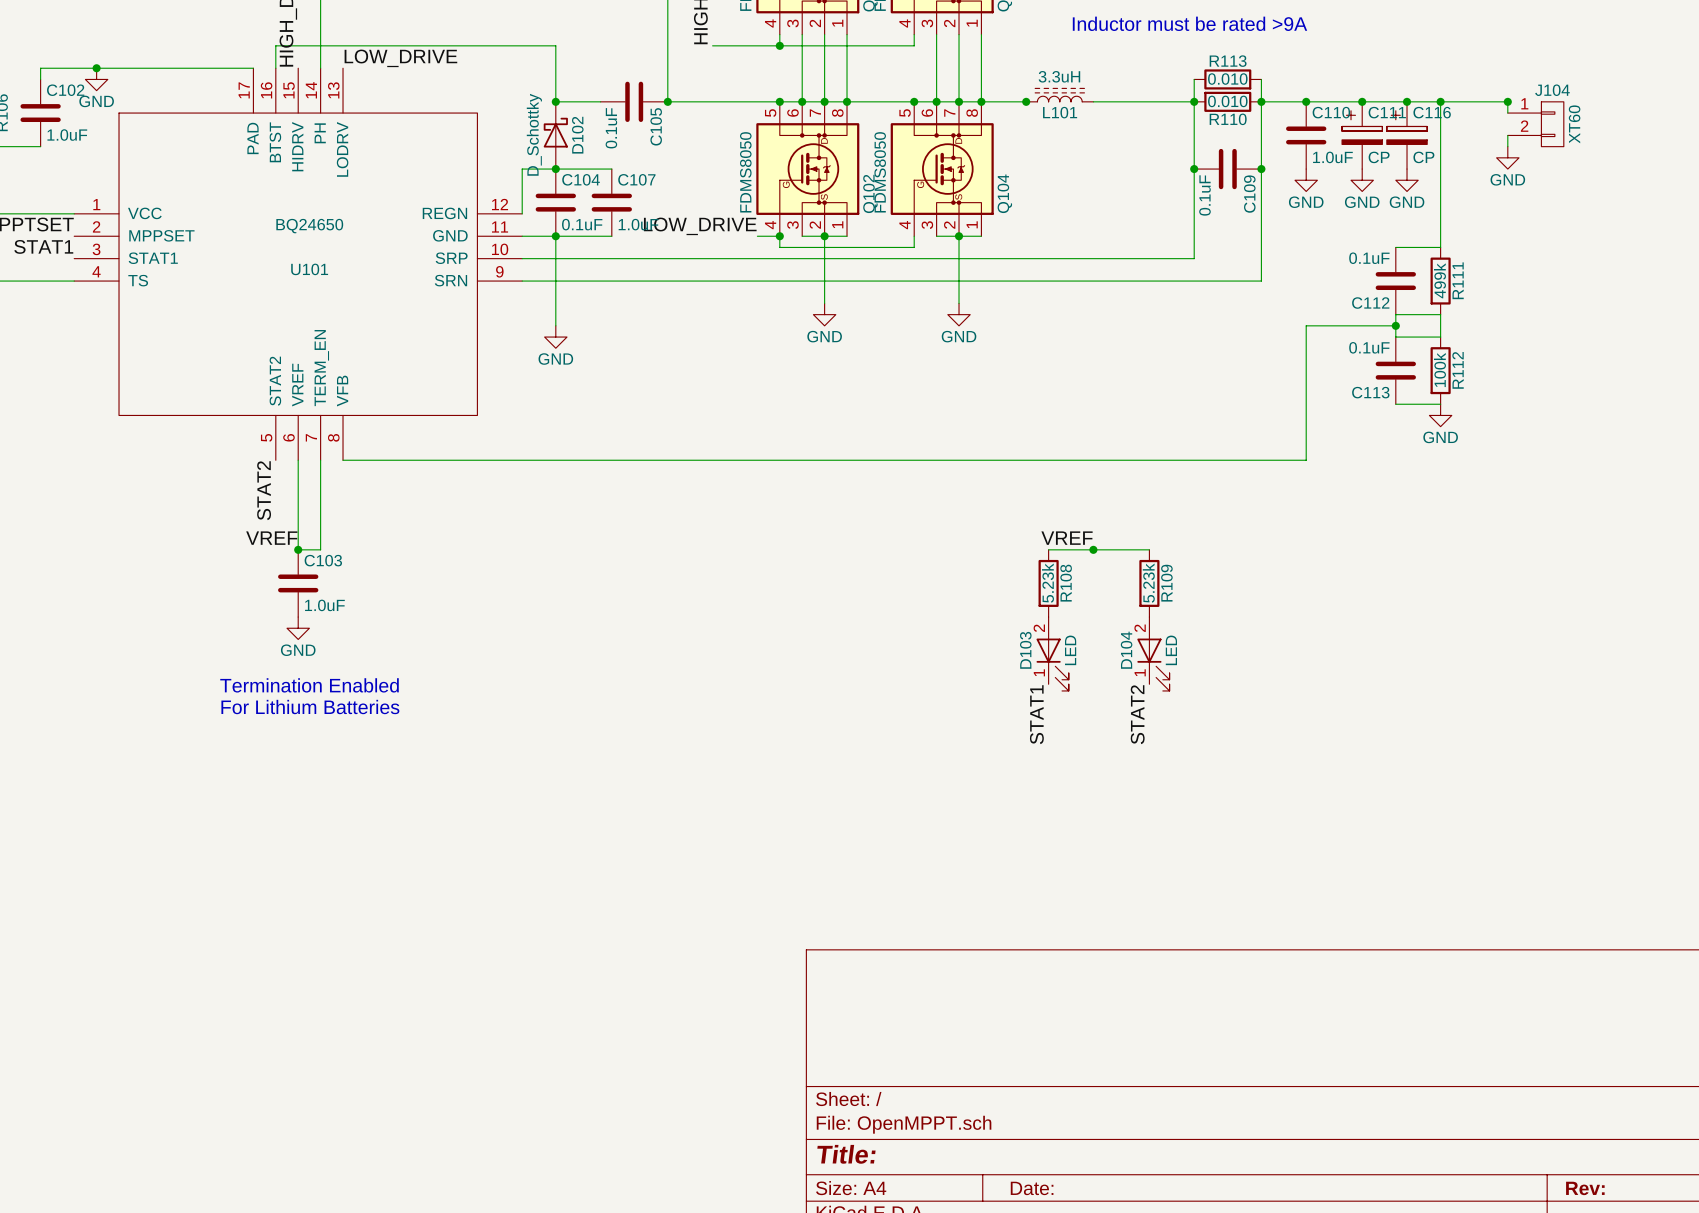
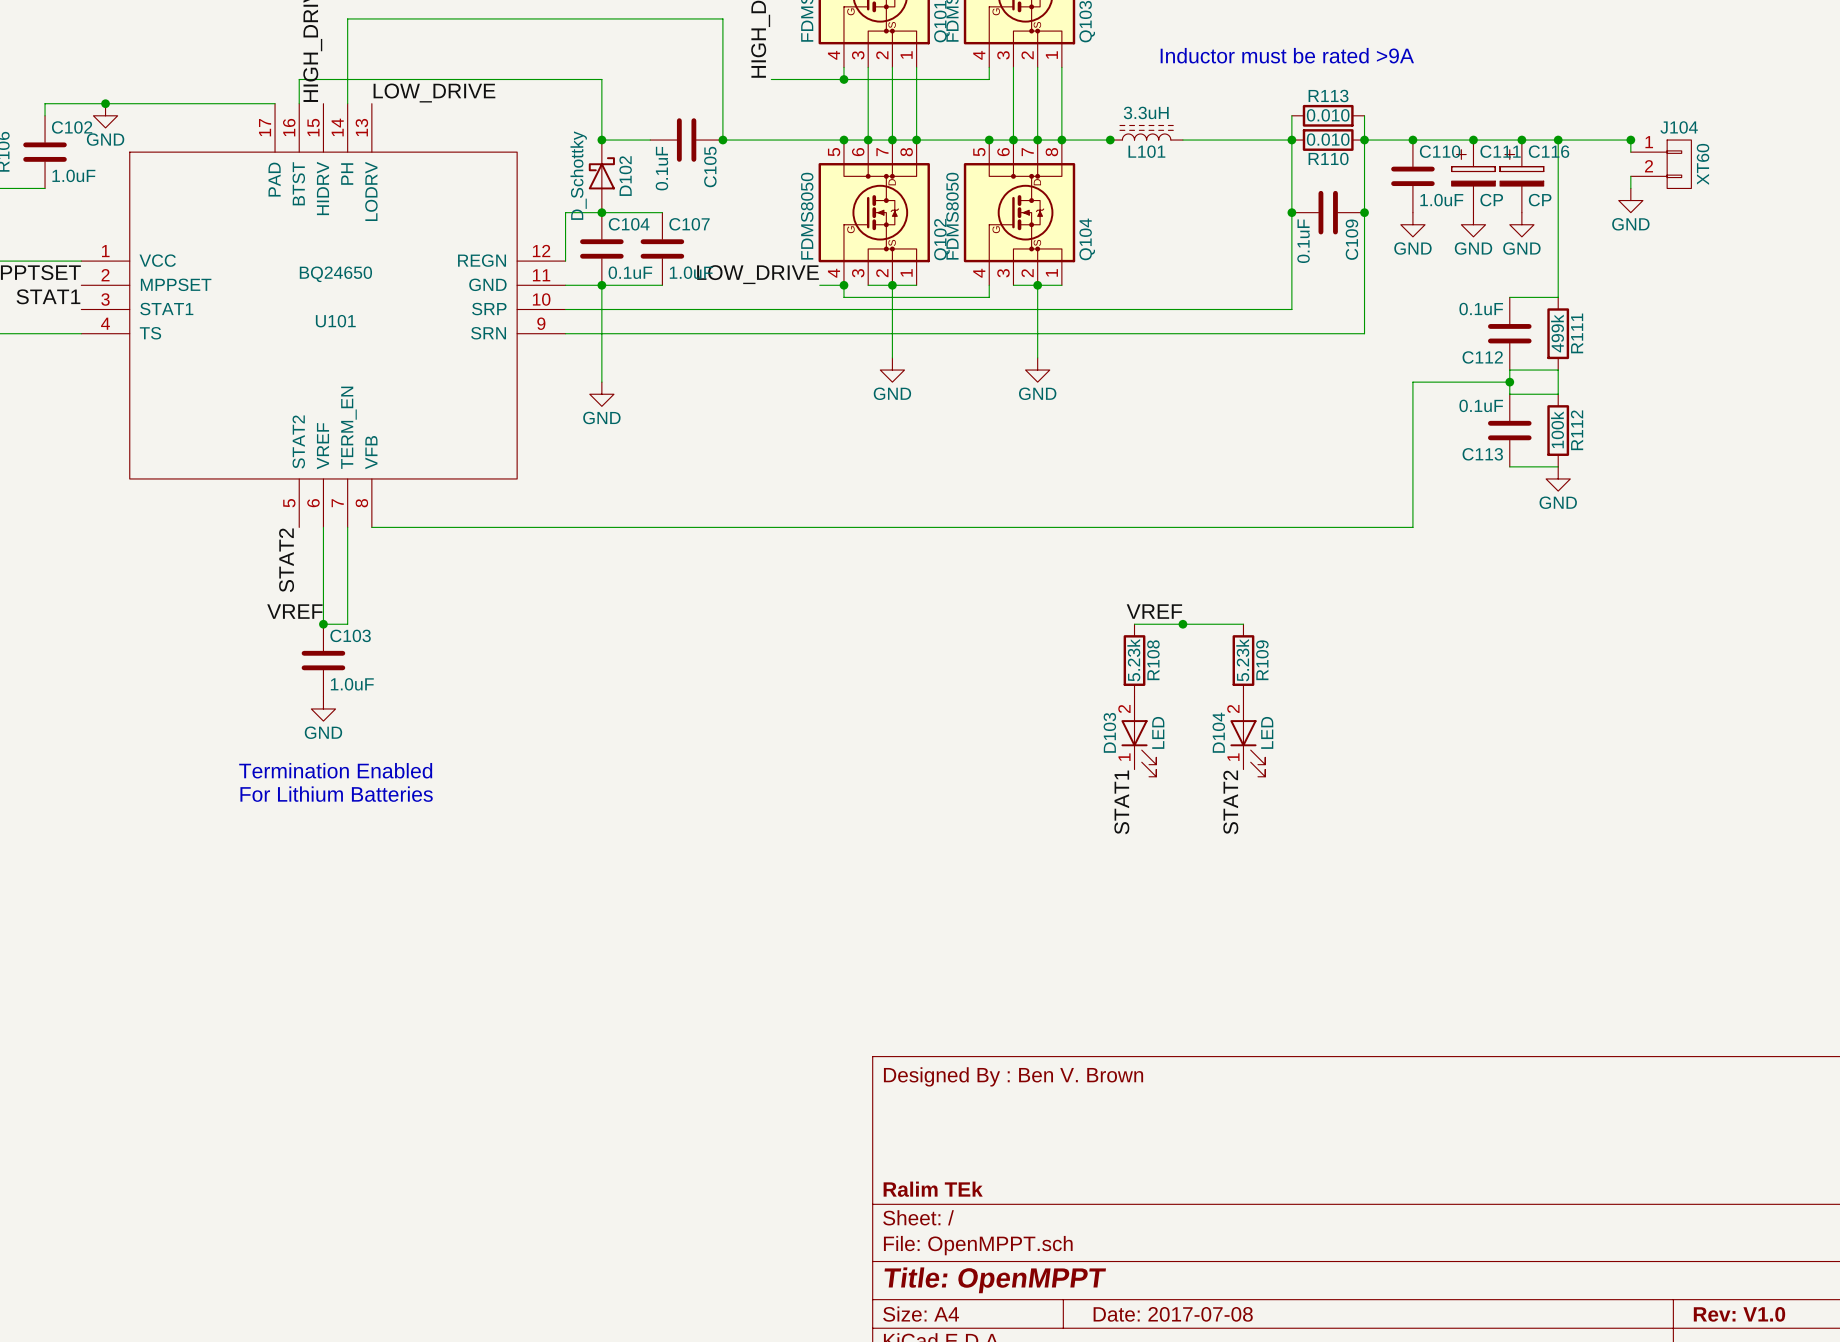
title block: none -> Designed By : Ben V. Brown (1013, 1076)
title block: none -> Ralim TEk (933, 1189)
title block: Title: (846, 1154) -> Title: OpenMPPT (995, 1280)
title block: Date: (1032, 1188) -> Date: 2017-07-08 (1173, 1314)
title block: Rev: (1585, 1188) -> Rev: V1.0 (1739, 1314)

